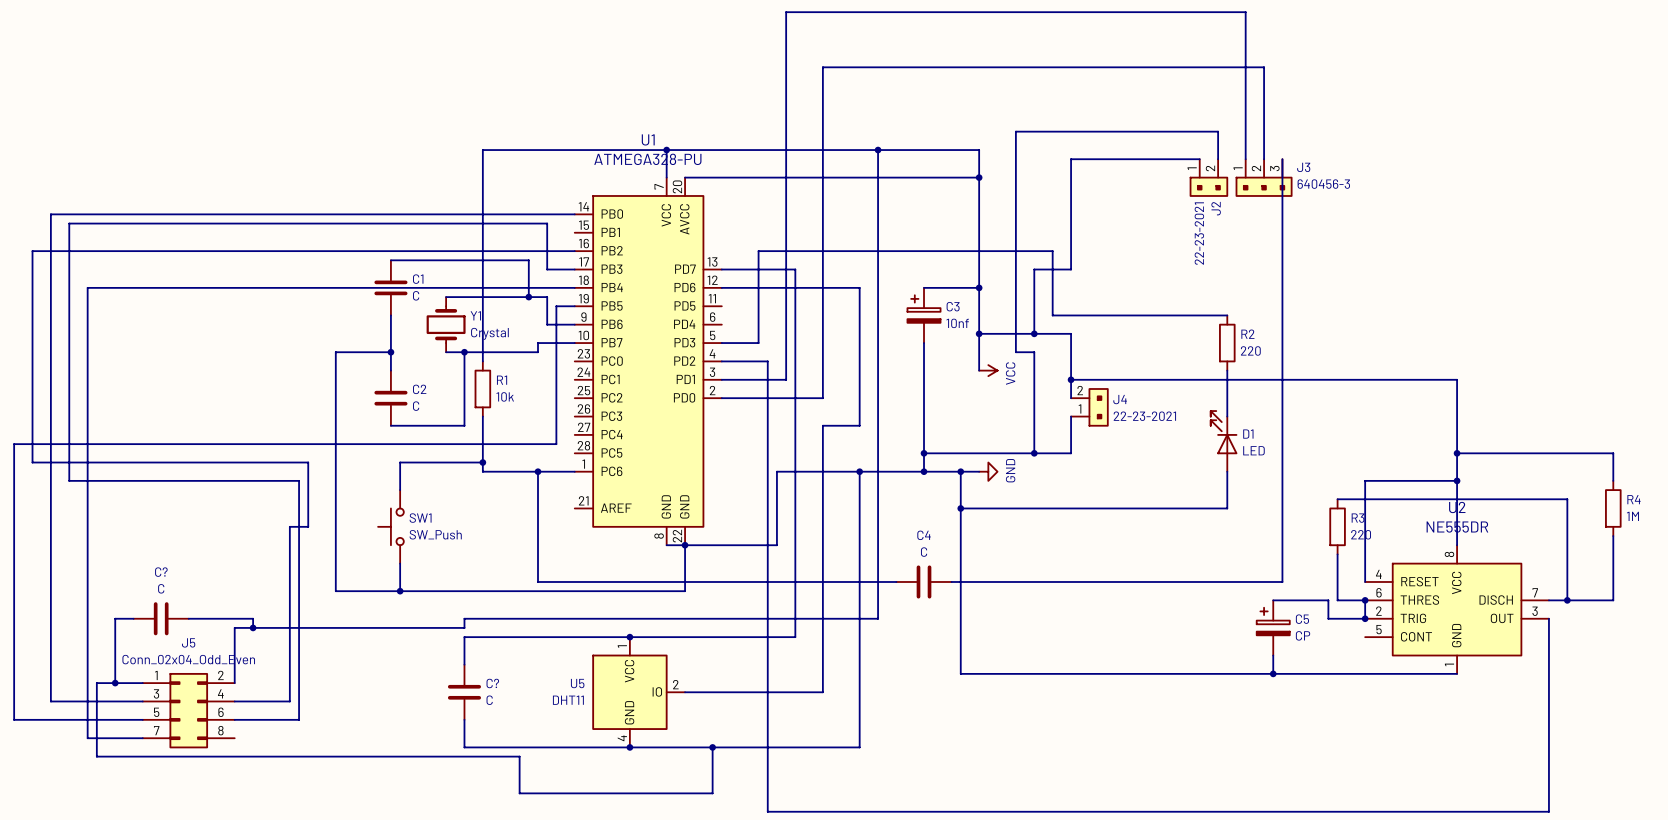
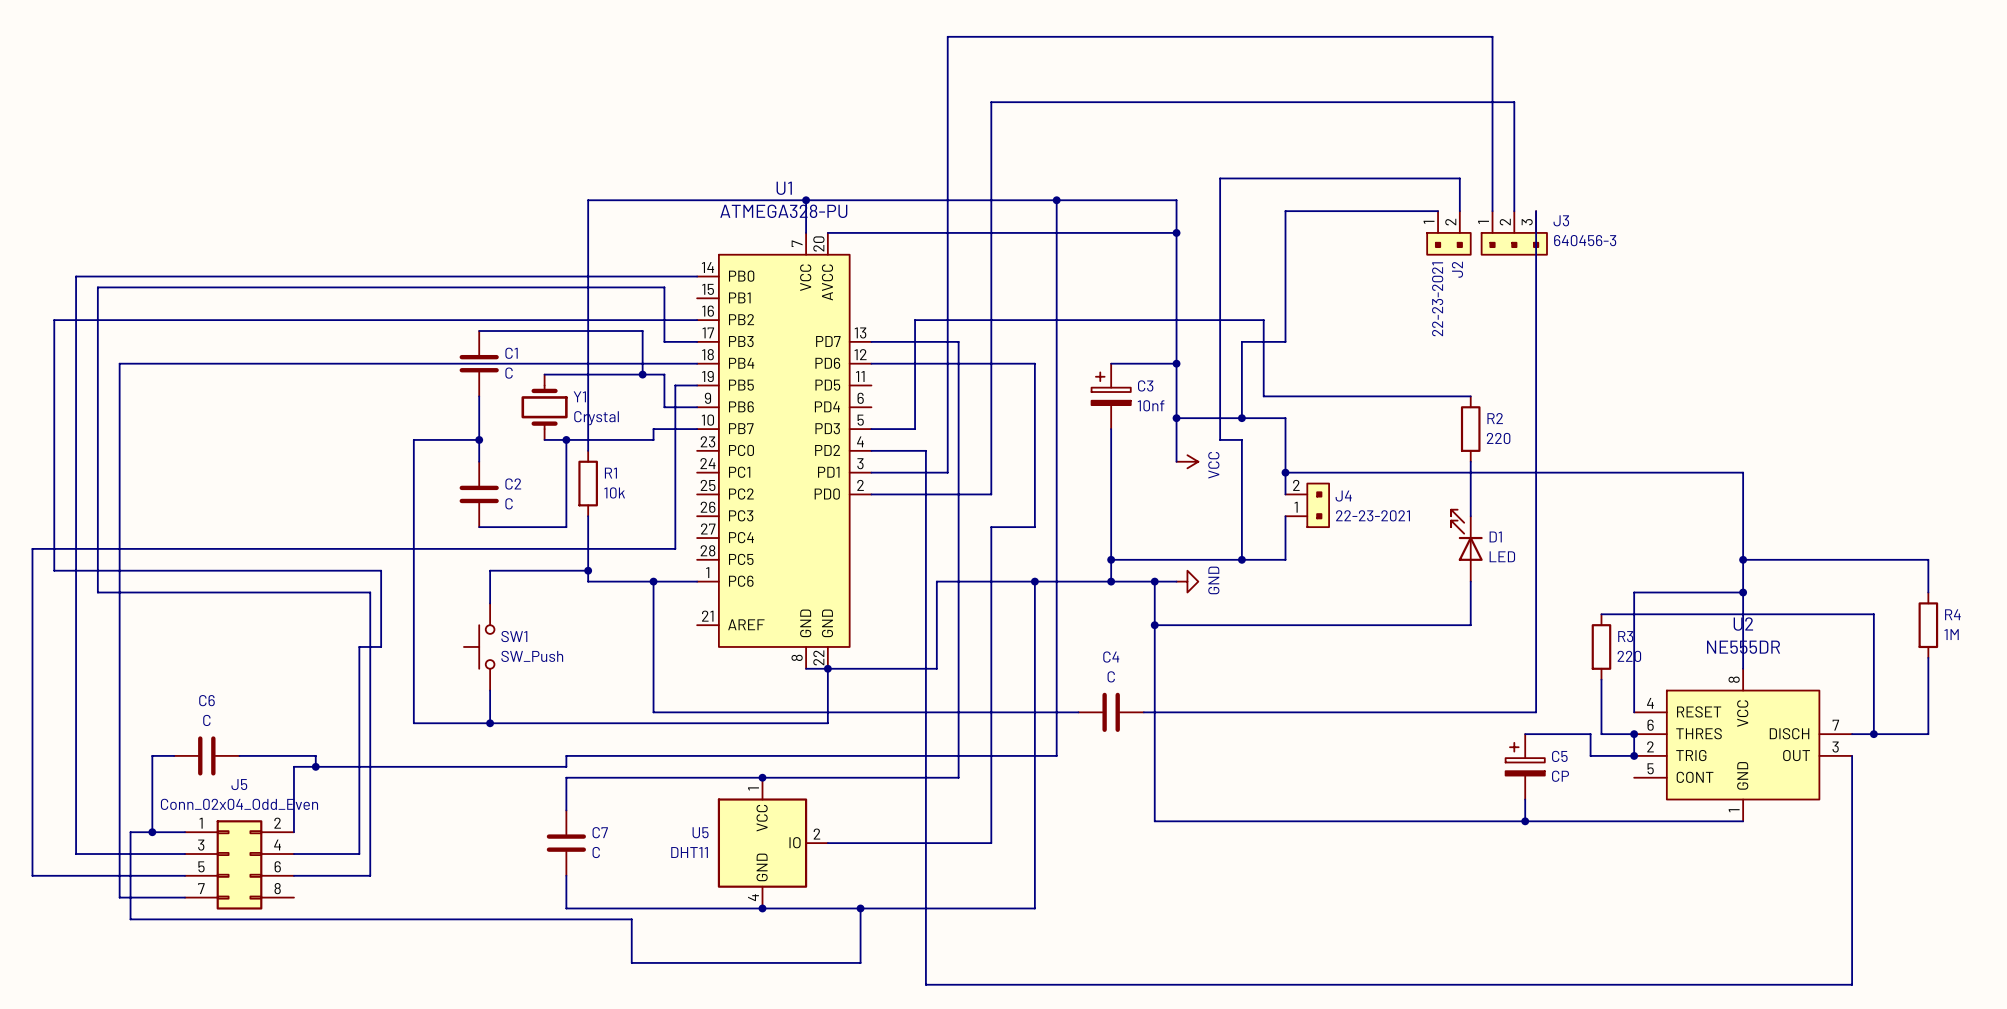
C? name: C? (161, 572) -> C6 (206, 700)
C? name: C? (492, 683) -> C7 (600, 832)

